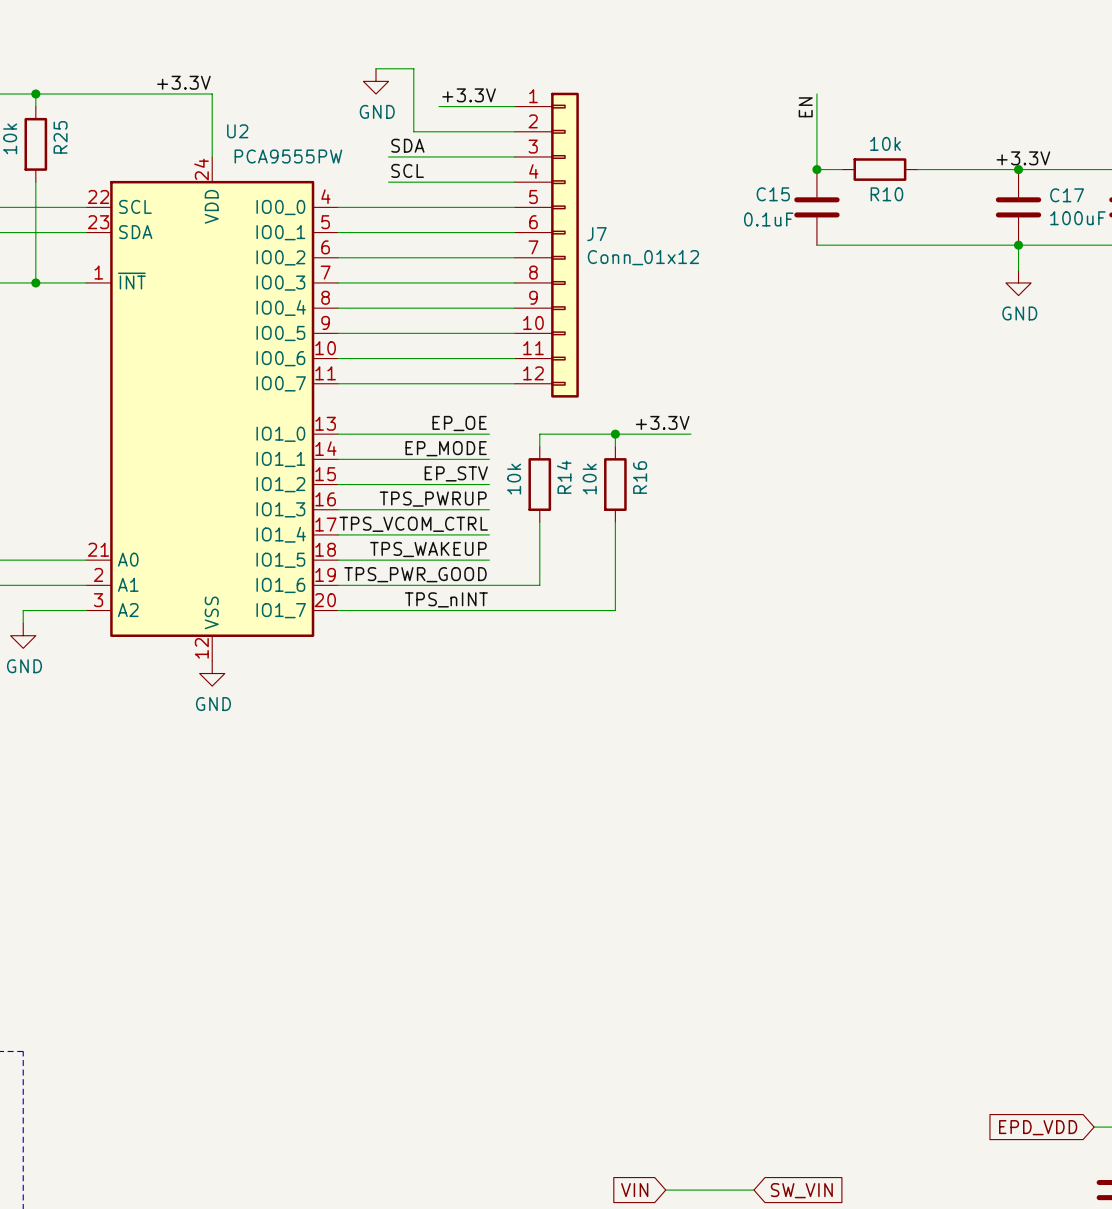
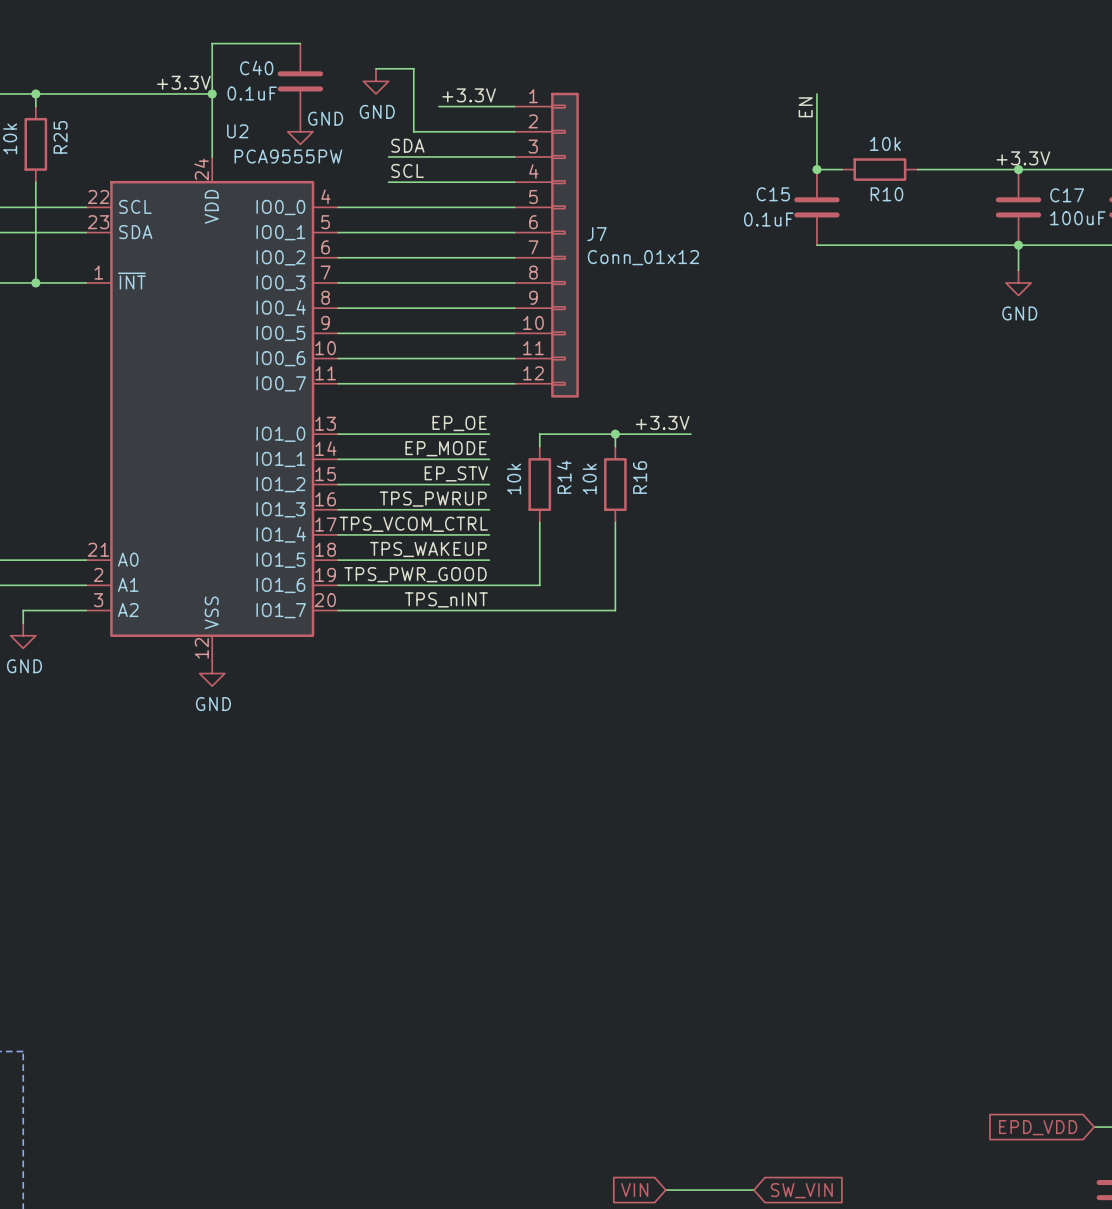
wire: none -> (300, 43) (212, 43) (212, 93)
C40: none -> 0.1uF (300, 81)
junction: none -> (212, 93)
power symbol: none -> GND (300, 131)

